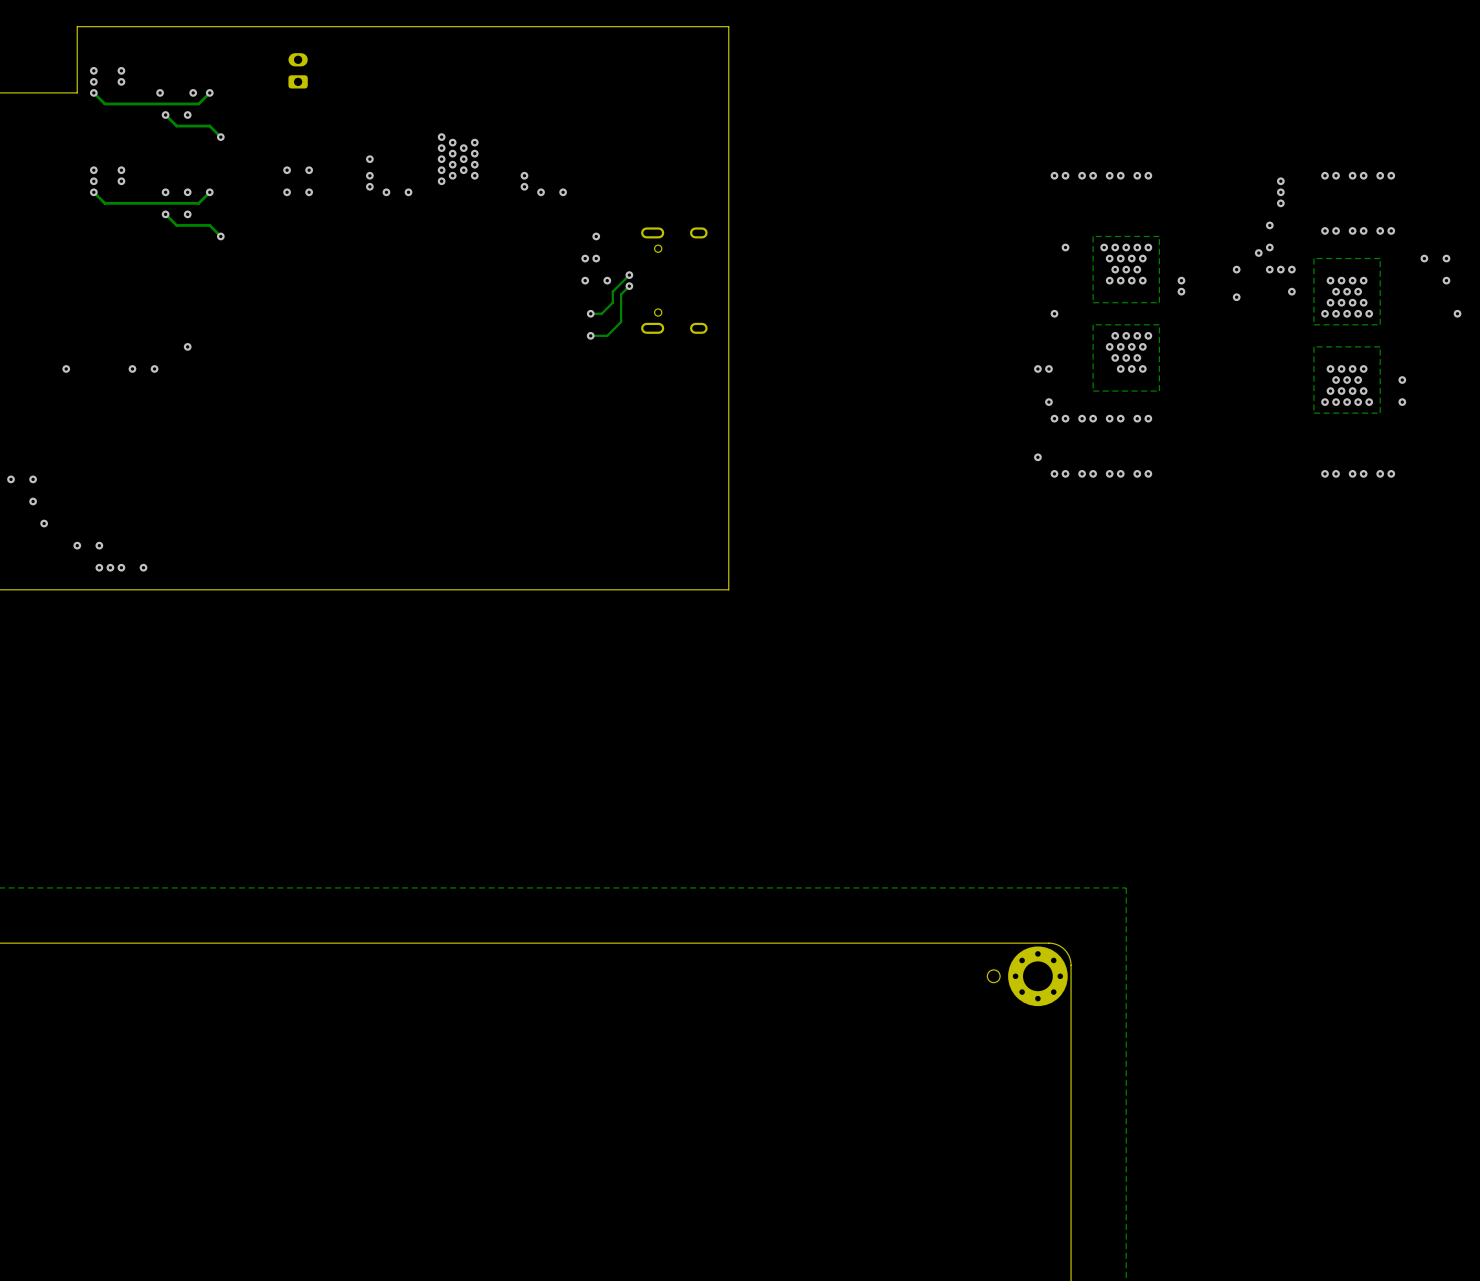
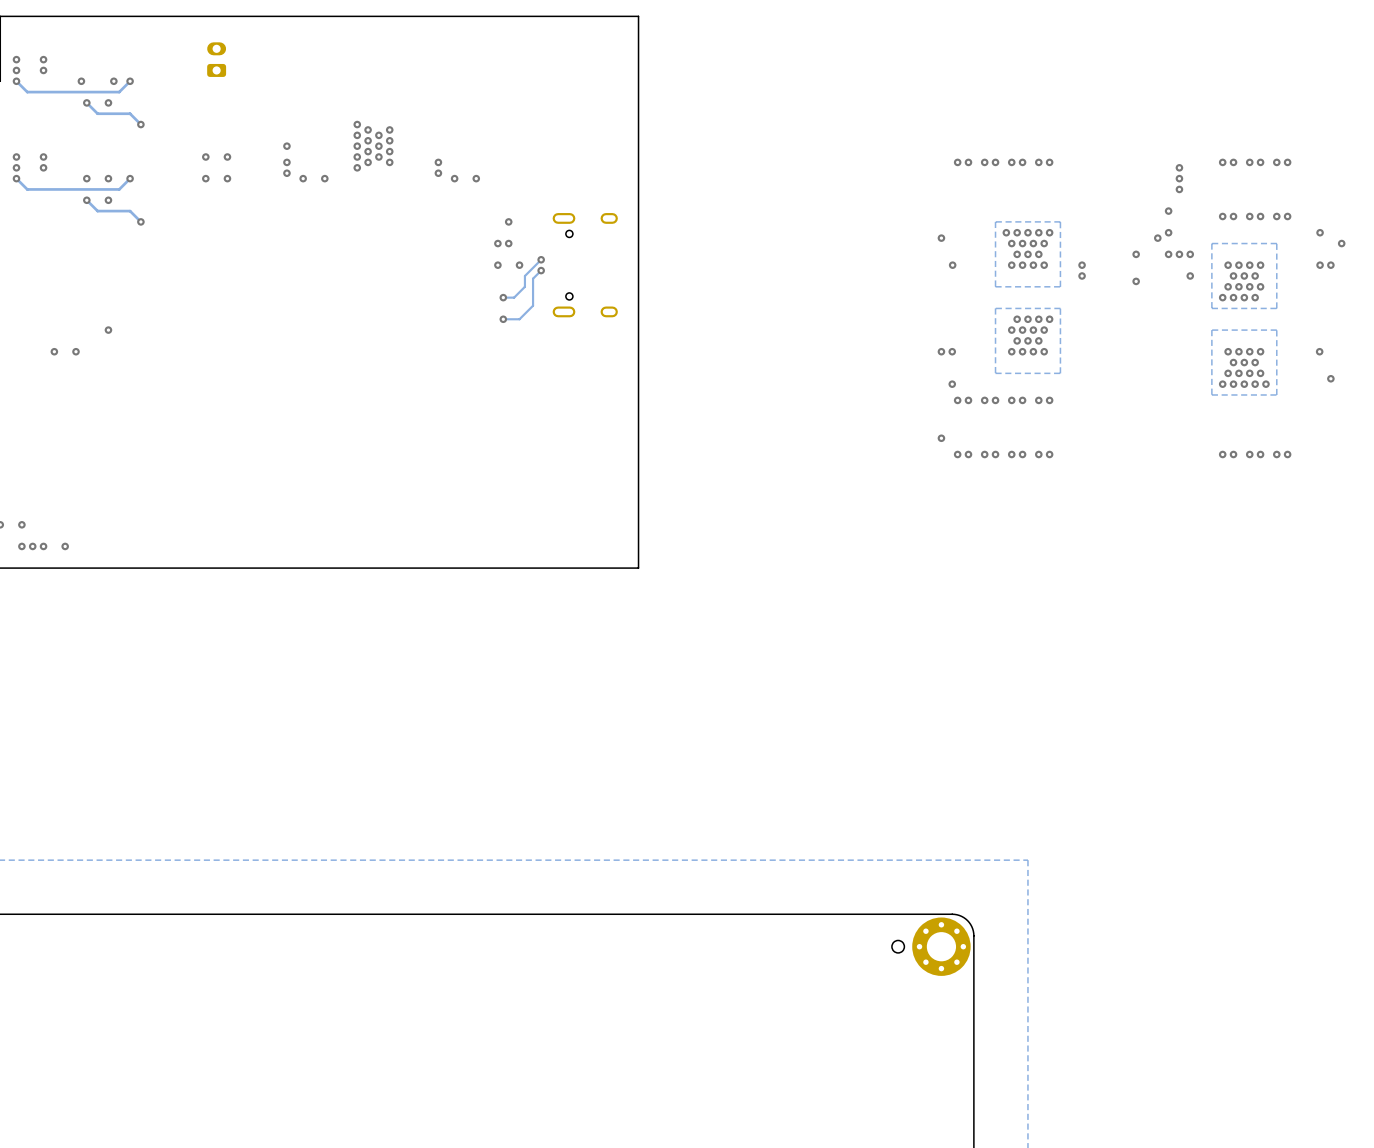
via: (1065, 247) -> none
via: none -> (1320, 232)
via: none -> (941, 238)
via: (1424, 258) -> none
via: none -> (952, 265)
via: none -> (1320, 265)
via: none -> (1330, 265)
via: (1446, 280) -> none
via: (1054, 313) -> none
via: (1369, 313) -> none
via: (1457, 313) -> none
via: none -> (1011, 351)
via: none -> (1319, 351)
via: (1402, 380) -> none
via: none -> (1330, 378)
via: (1402, 402) -> none

